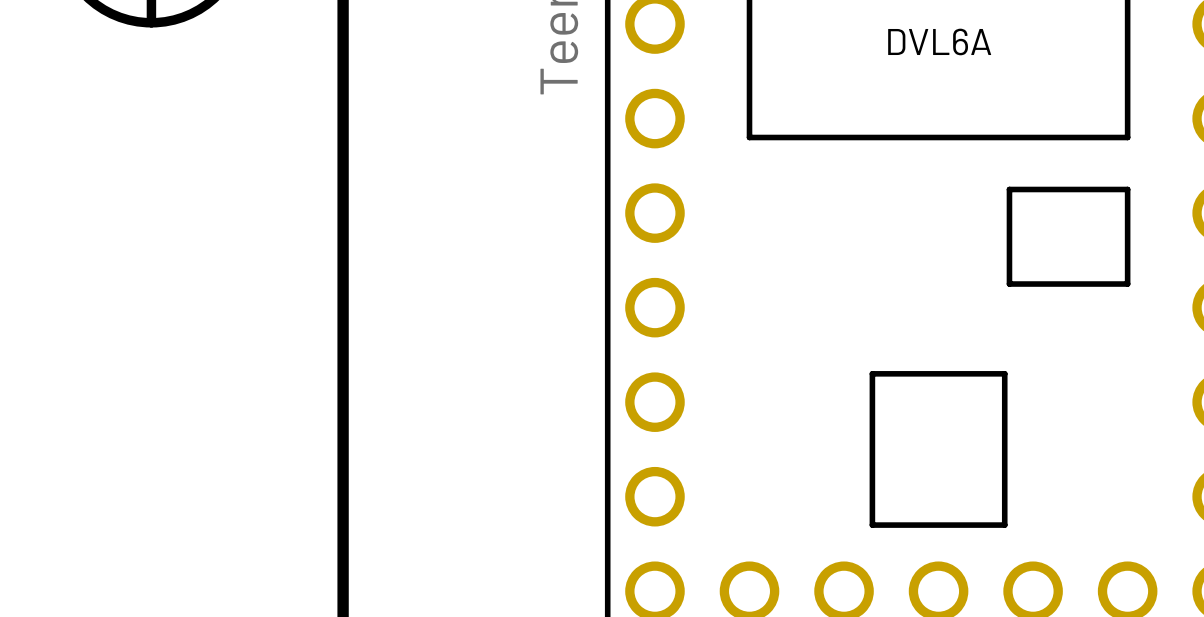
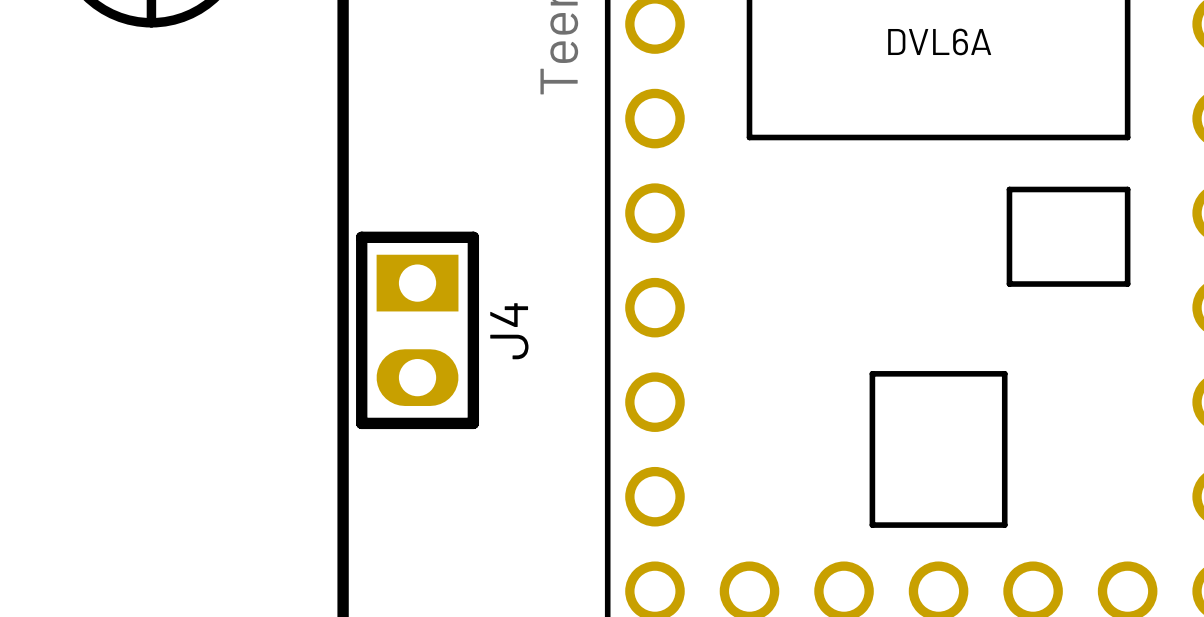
J4: none -> (417, 330)

